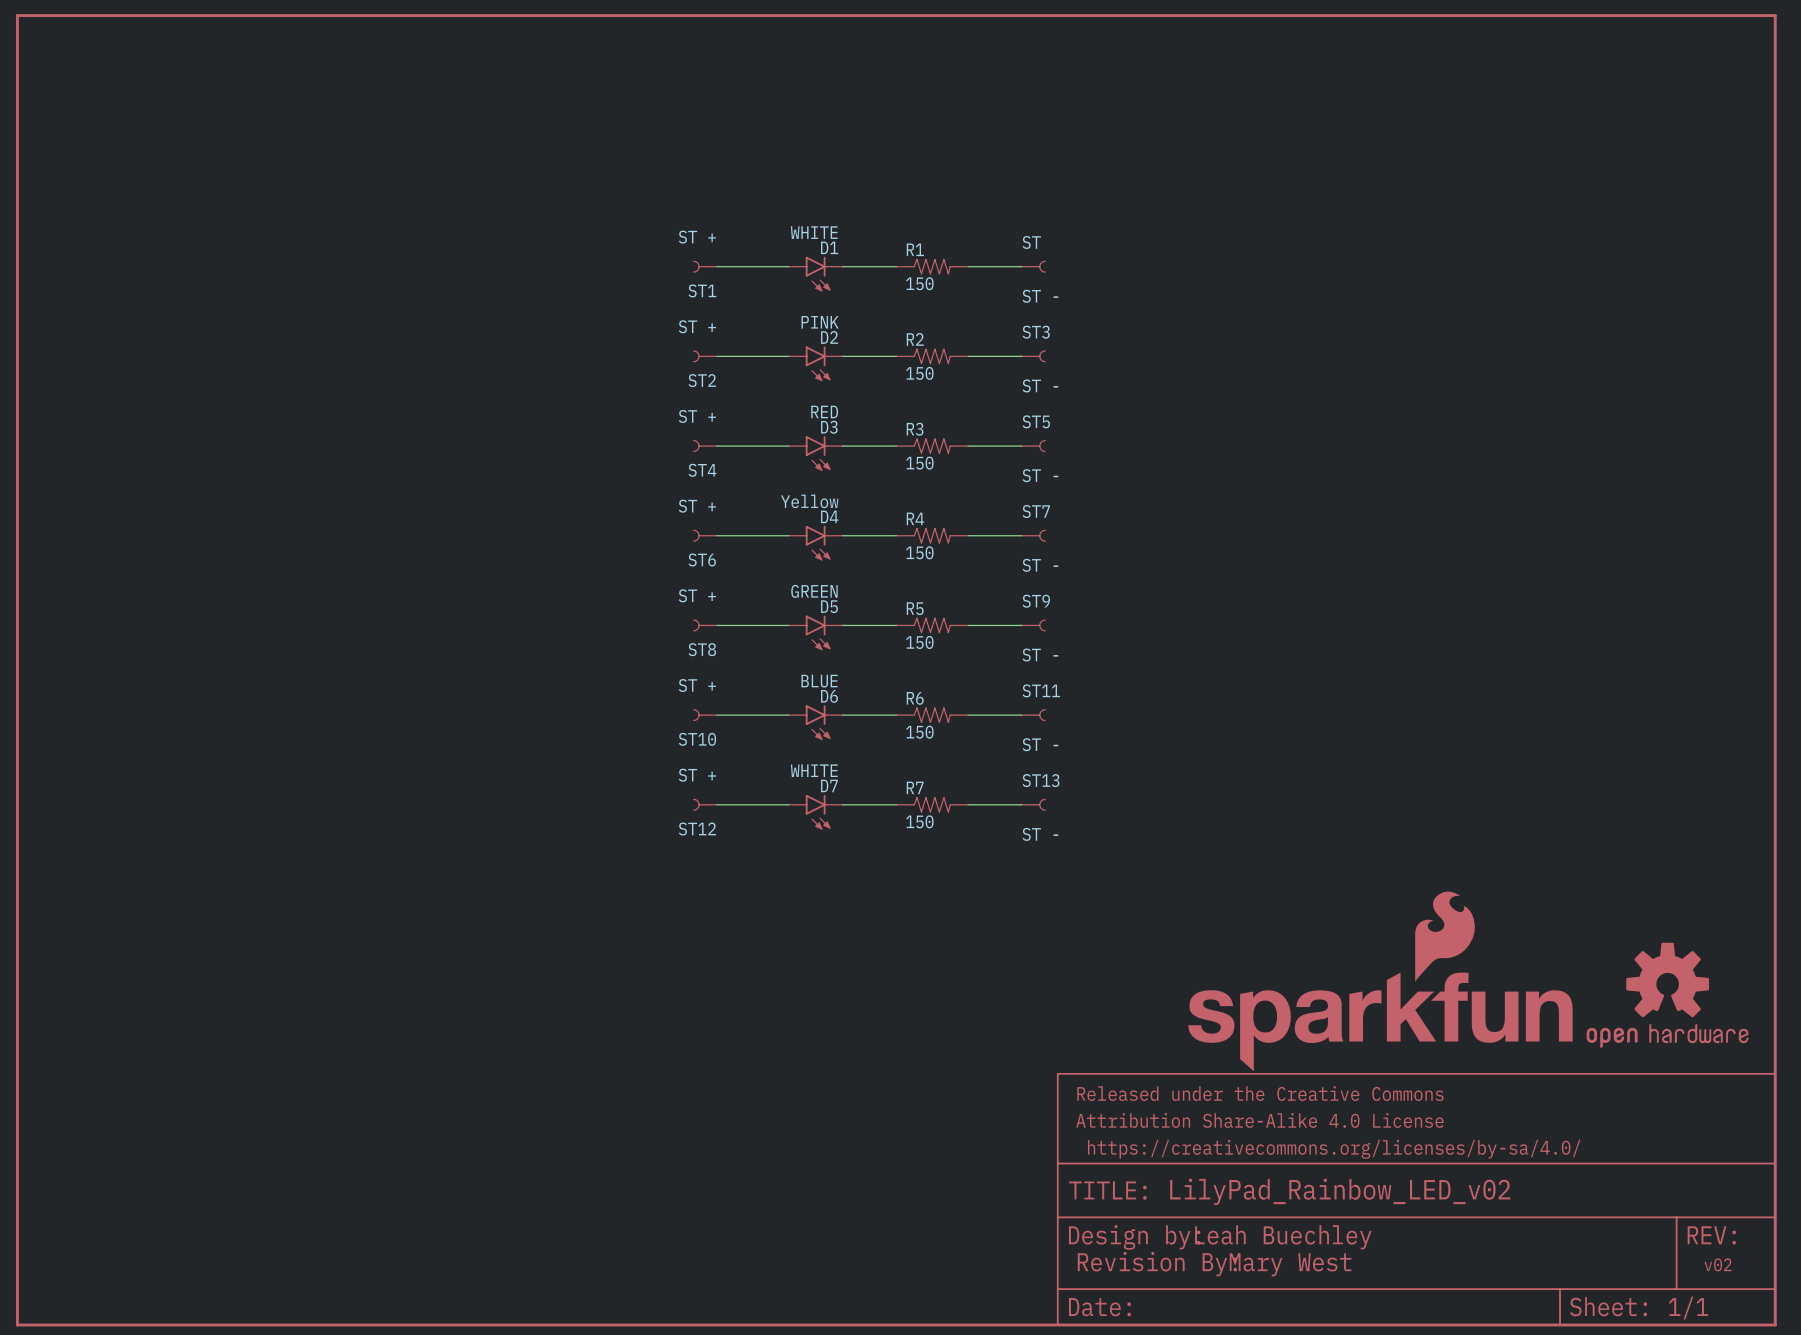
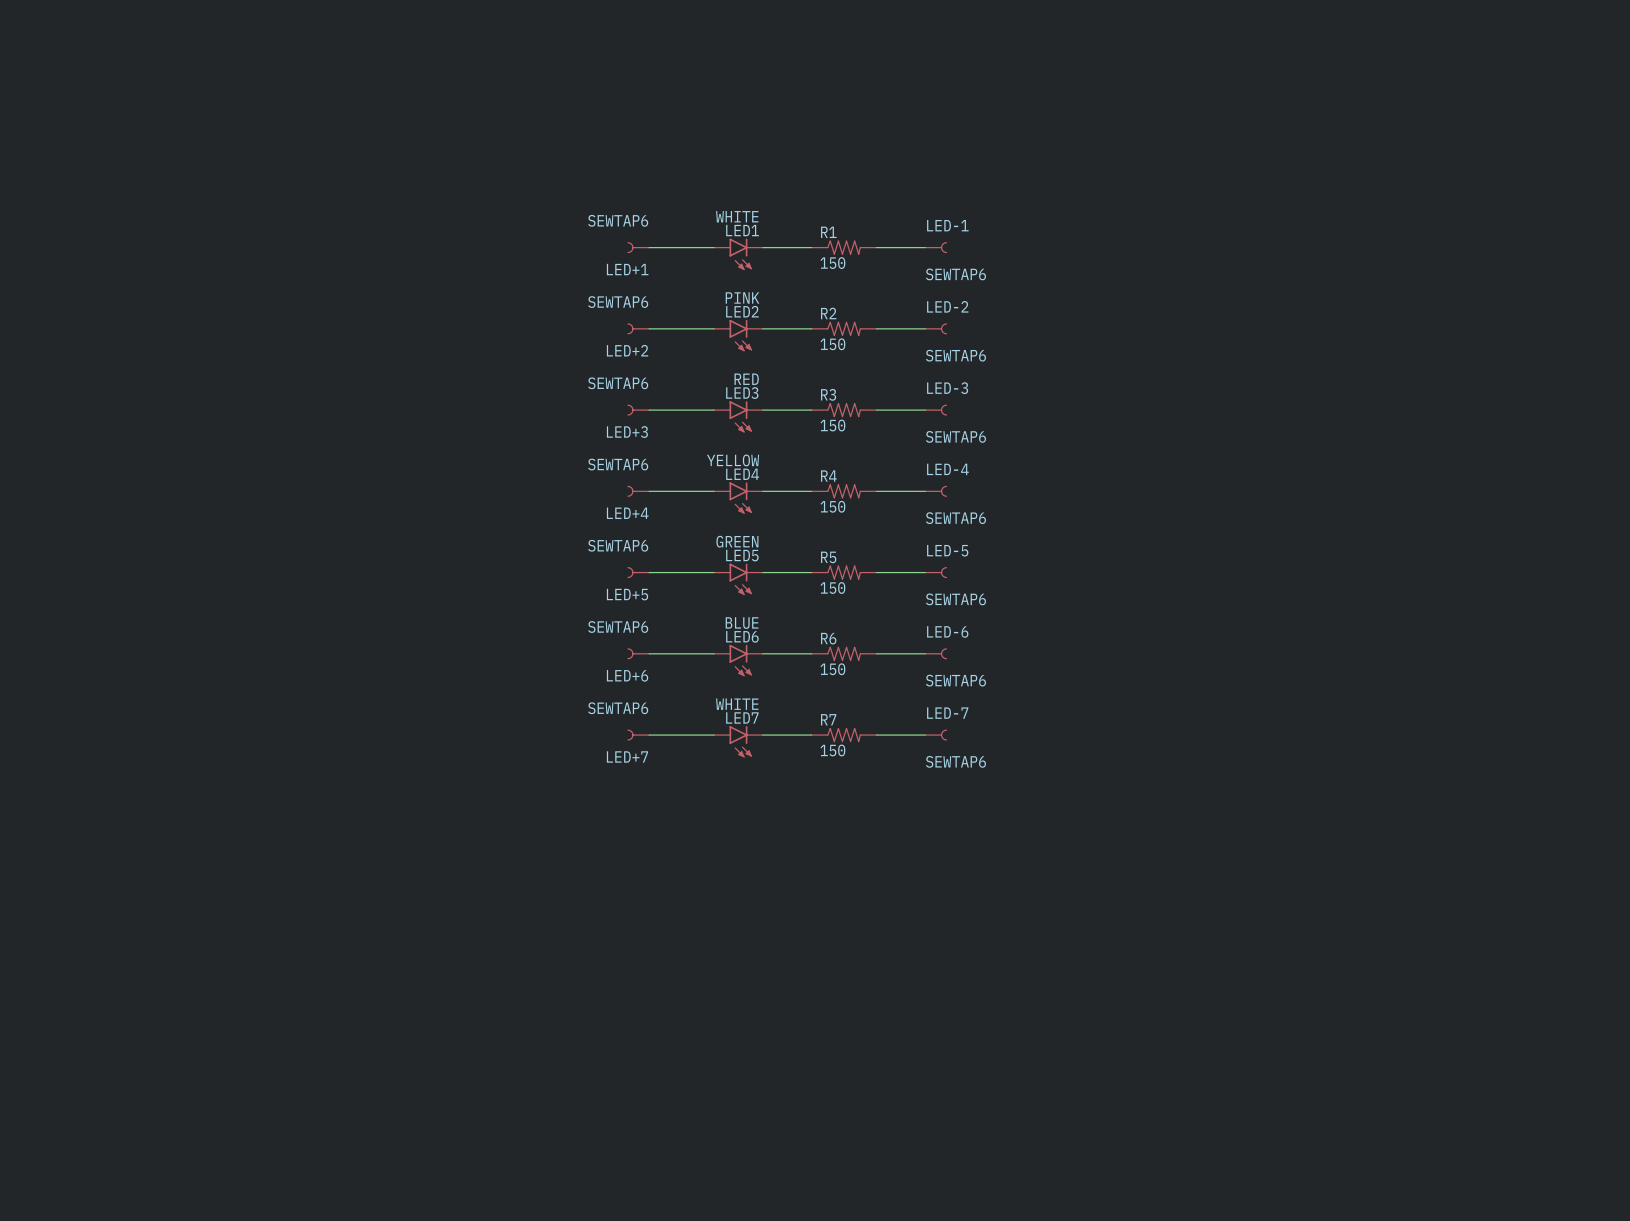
ST1 value: ST + (697, 237) -> SEWTAP6 (618, 220)
ST name: ST (1031, 242) -> LED-1 (947, 225)
D1 name: D1 (829, 247) -> LED1 (742, 230)
ST1 name: ST1 (702, 290) -> LED+1 (627, 269)
ST value: ST - (1040, 296) -> SEWTAP6 (955, 274)
ST2 value: ST + (697, 326) -> SEWTAP6 (618, 302)
ST3 name: ST3 (1036, 332) -> LED-2 (947, 306)
D2 name: D2 (829, 337) -> LED2 (742, 311)
ST2 name: ST2 (702, 380) -> LED+2 (627, 350)
ST3 value: ST - (1040, 385) -> SEWTAP6 (955, 355)
ST4 value: ST + (697, 416) -> SEWTAP6 (618, 383)
ST5 name: ST5 (1036, 421) -> LED-3 (947, 388)
D3 name: D3 (829, 427) -> LED3 (742, 393)
ST4 name: ST4 (702, 470) -> LED+3 (627, 432)
ST5 value: ST - (1040, 475) -> SEWTAP6 (955, 436)
D4 value: Yellow (809, 501) -> YELLOW (733, 460)
ST6 value: ST + (697, 506) -> SEWTAP6 (618, 464)
ST7 name: ST7 (1036, 511) -> LED-4 (947, 469)
D4 name: D4 (829, 516) -> LED4 (742, 474)
ST6 name: ST6 (702, 559) -> LED+4 (627, 513)
ST7 value: ST - (1040, 565) -> SEWTAP6 (955, 518)
ST8 value: ST + (697, 595) -> SEWTAP6 (618, 545)
ST9 name: ST9 (1036, 601) -> LED-5 (947, 550)
D5 name: D5 (829, 606) -> LED5 (742, 555)
ST8 name: ST8 (702, 649) -> LED+5 (627, 594)
ST9 value: ST - (1040, 655) -> SEWTAP6 (955, 599)
part: (896, 670) -> none
ST10 value: ST + (697, 685) -> SEWTAP6 (618, 627)
ST11 name: ST11 (1041, 690) -> LED-6 (947, 631)
D6 name: D6 (829, 696) -> LED6 (742, 636)
ST10 name: ST10 (697, 739) -> LED+6 (627, 675)
ST11 value: ST - (1040, 744) -> SEWTAP6 (955, 680)
ST12 value: ST + (697, 775) -> SEWTAP6 (618, 708)
ST13 name: ST13 (1041, 780) -> LED-7 (947, 713)
D7 name: D7 (829, 785) -> LED7 (742, 717)
ST12 name: ST12 (697, 829) -> LED+7 (627, 756)
ST13 value: ST - (1040, 834) -> SEWTAP6 (955, 761)
part: (1380, 981) -> none
part: (1667, 995) -> none
part: (1416, 1199) -> none
text: Leah Buechley (1283, 1237) -> none
part: (1157, 1264) -> none
text: Mary West (1290, 1264) -> none
text: v02 (1718, 1264) -> none

